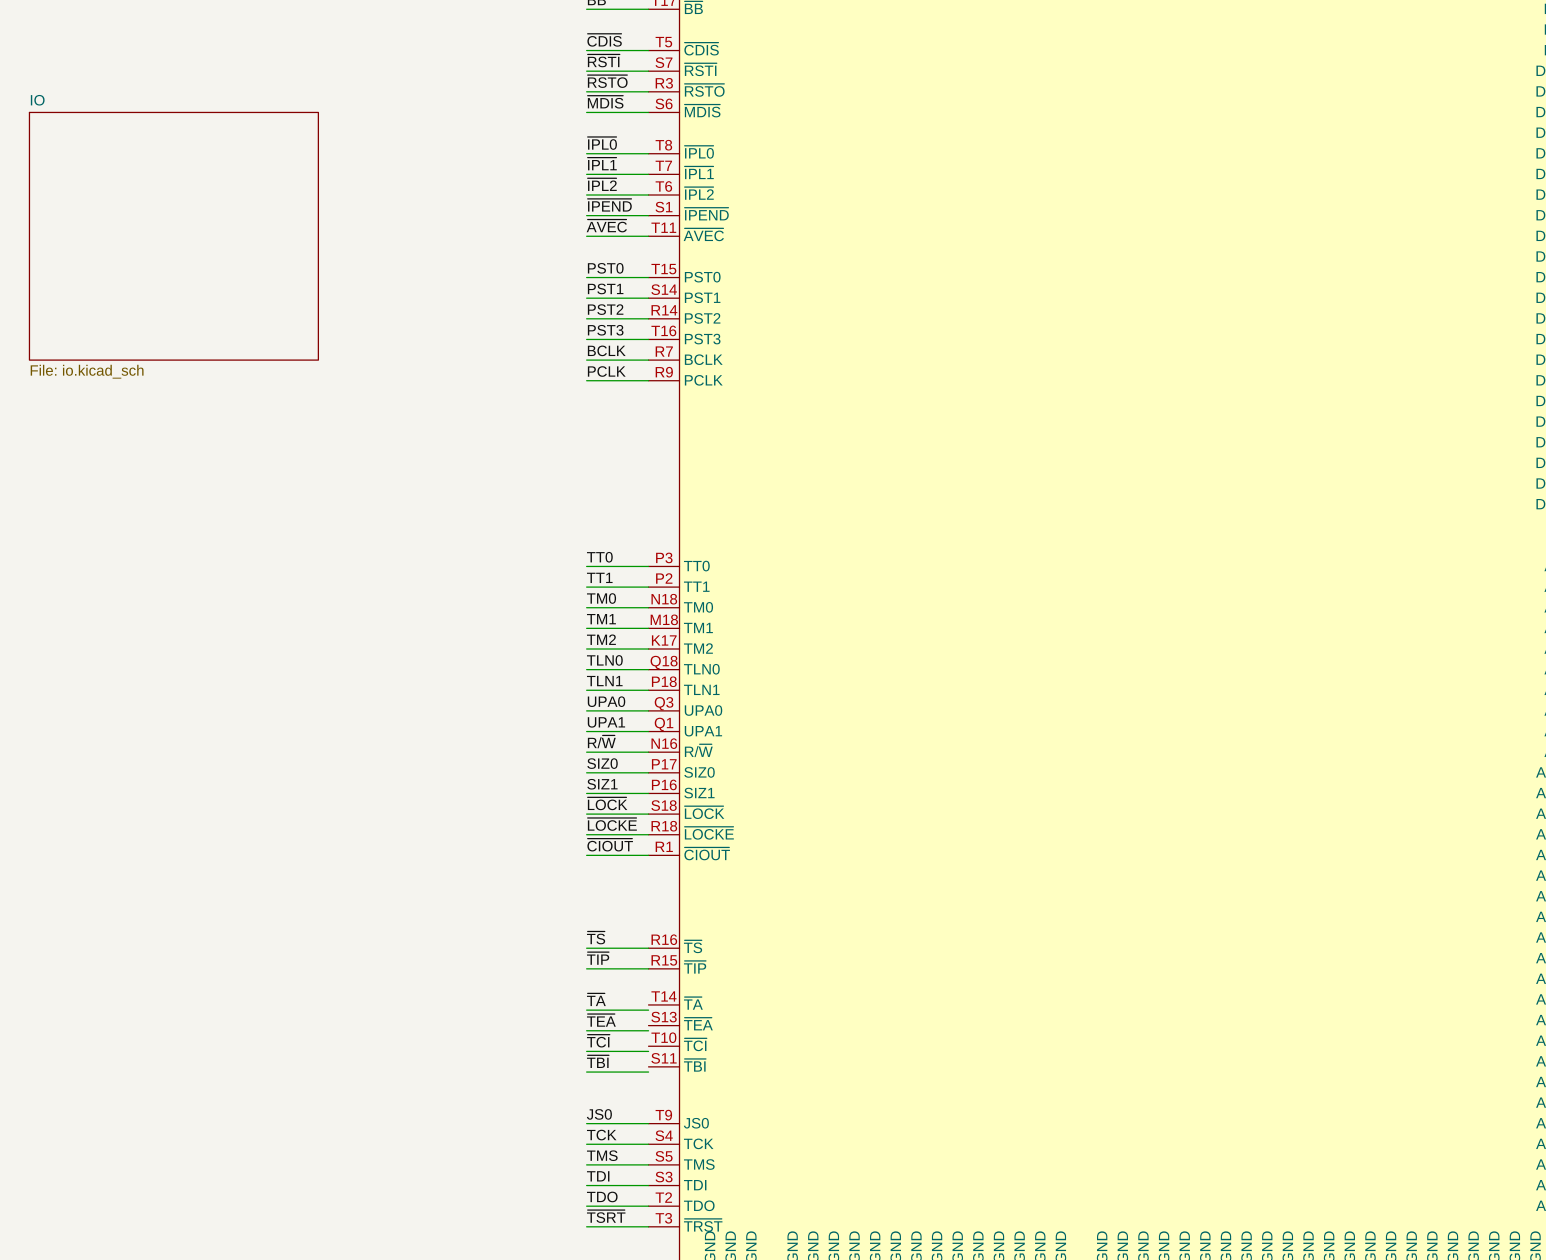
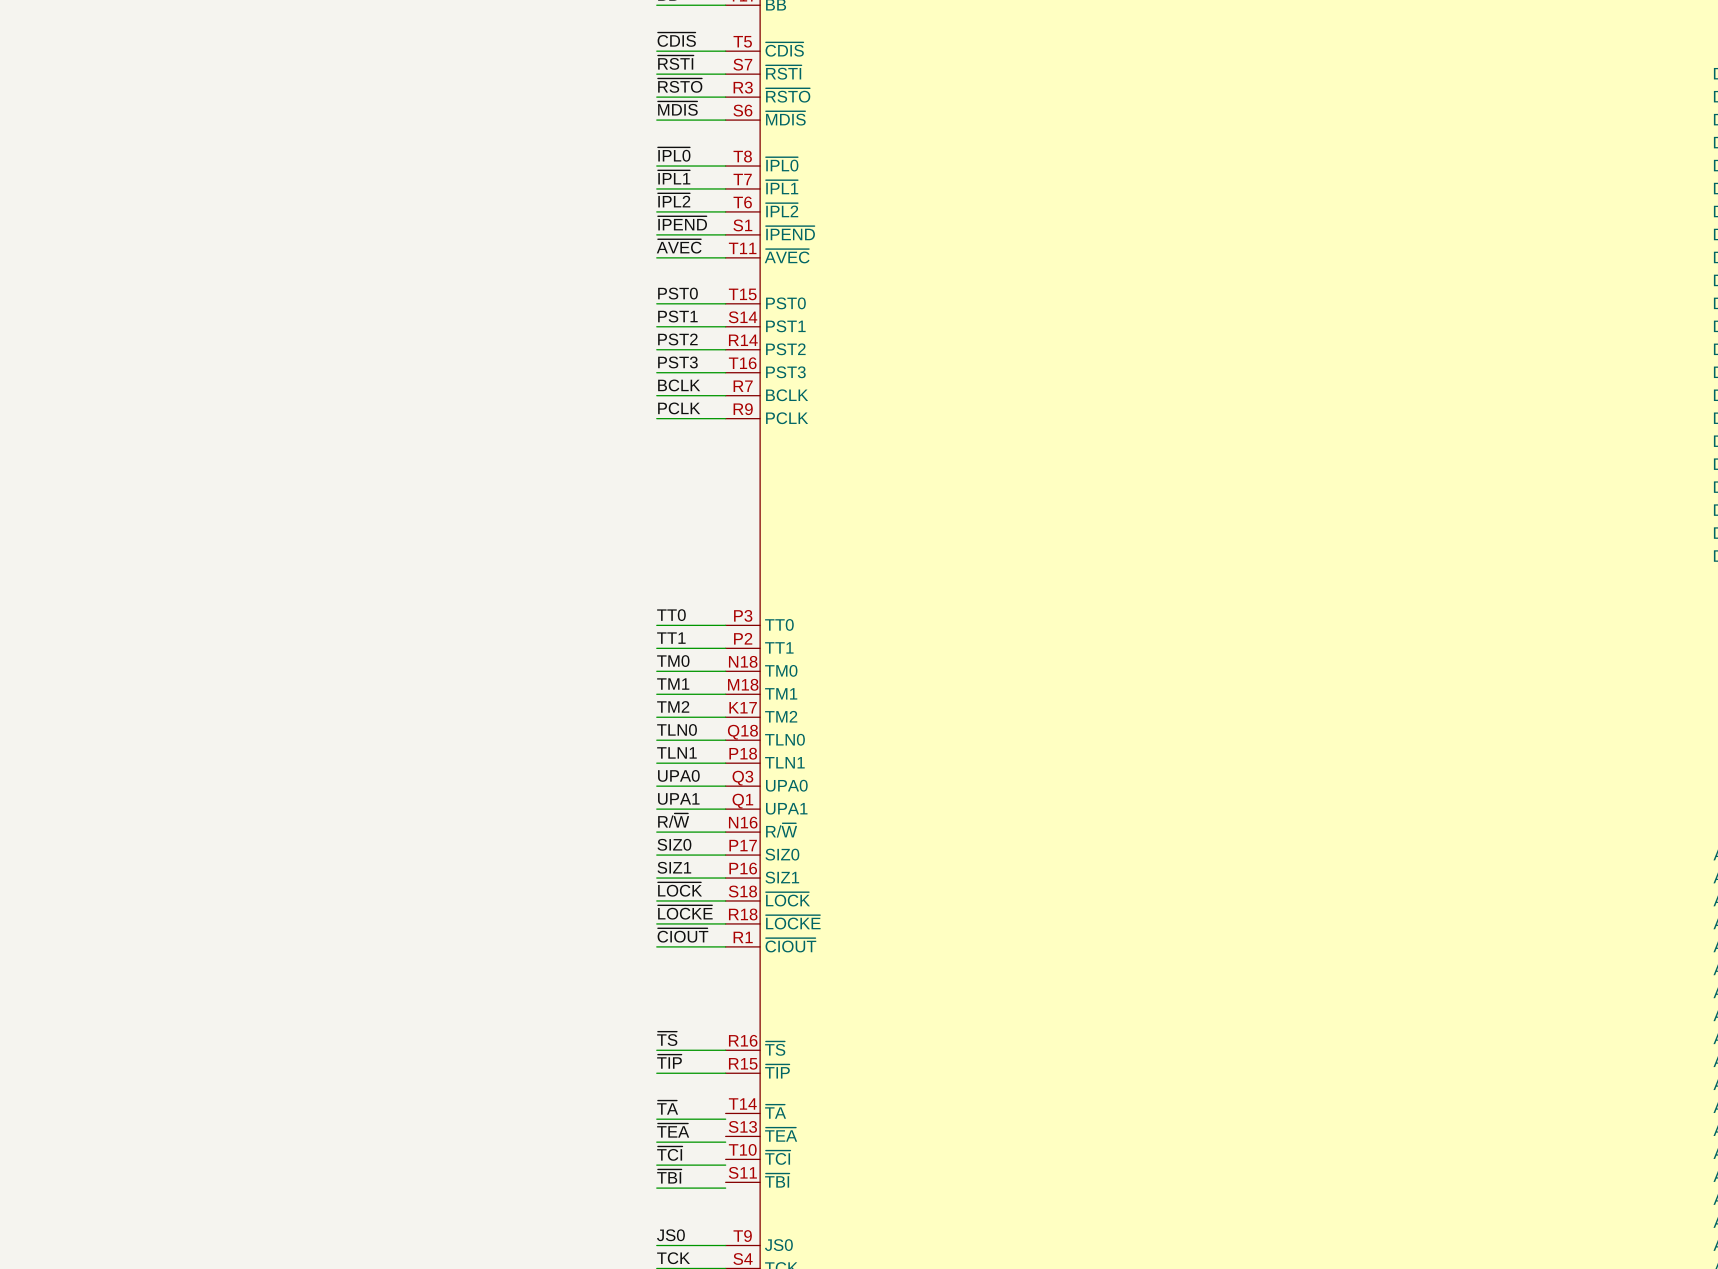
sheet IO: File: io.kicad_sch (173, 236) -> none

